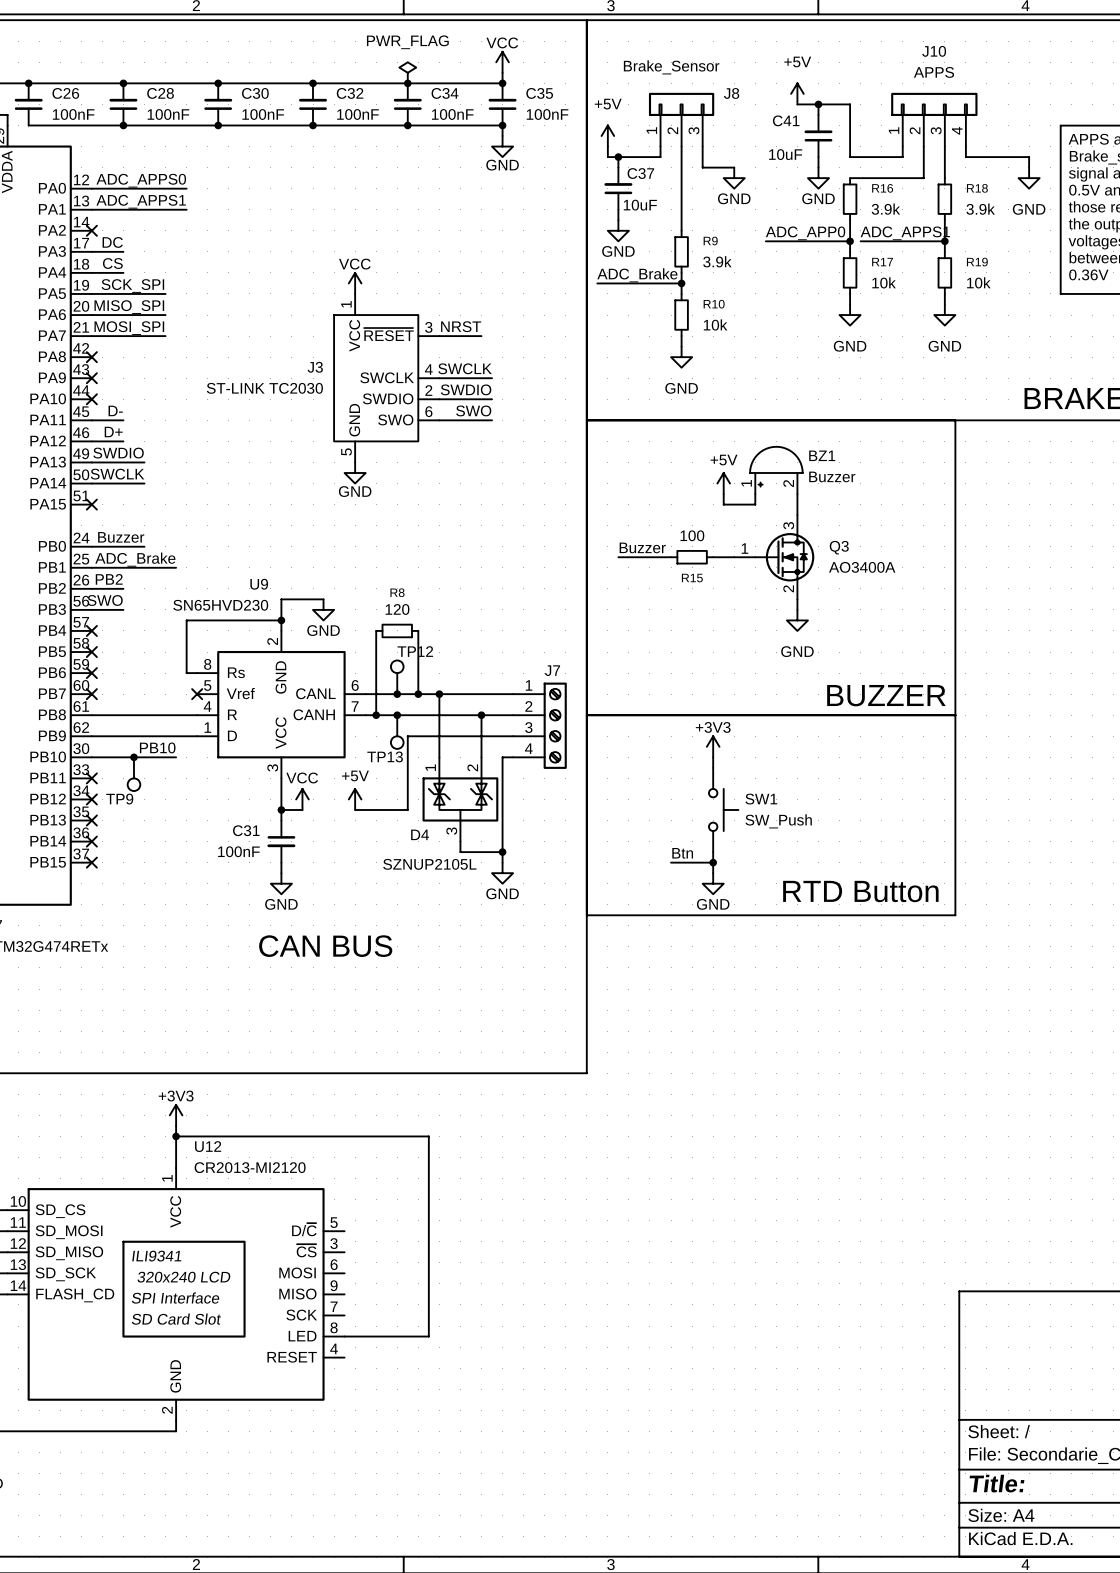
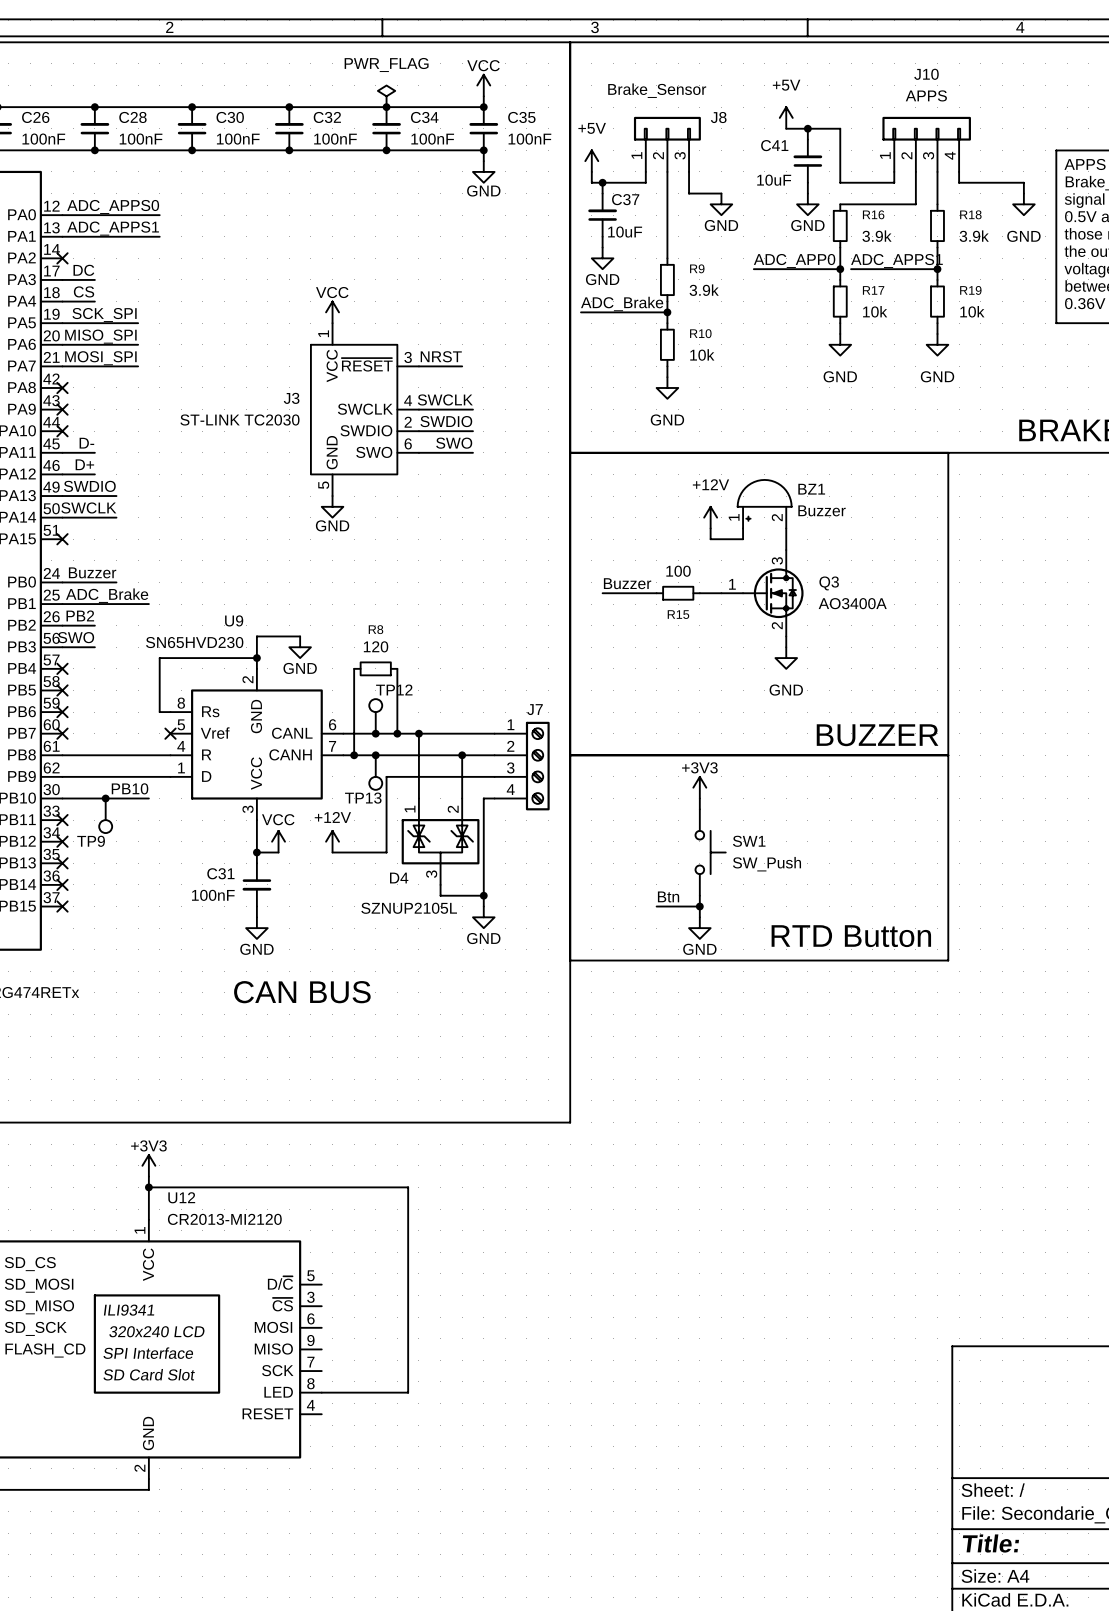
power symbol: +5V (723, 483) -> +12V (710, 517)
power symbol: +5V (355, 799) -> +12V (332, 841)

